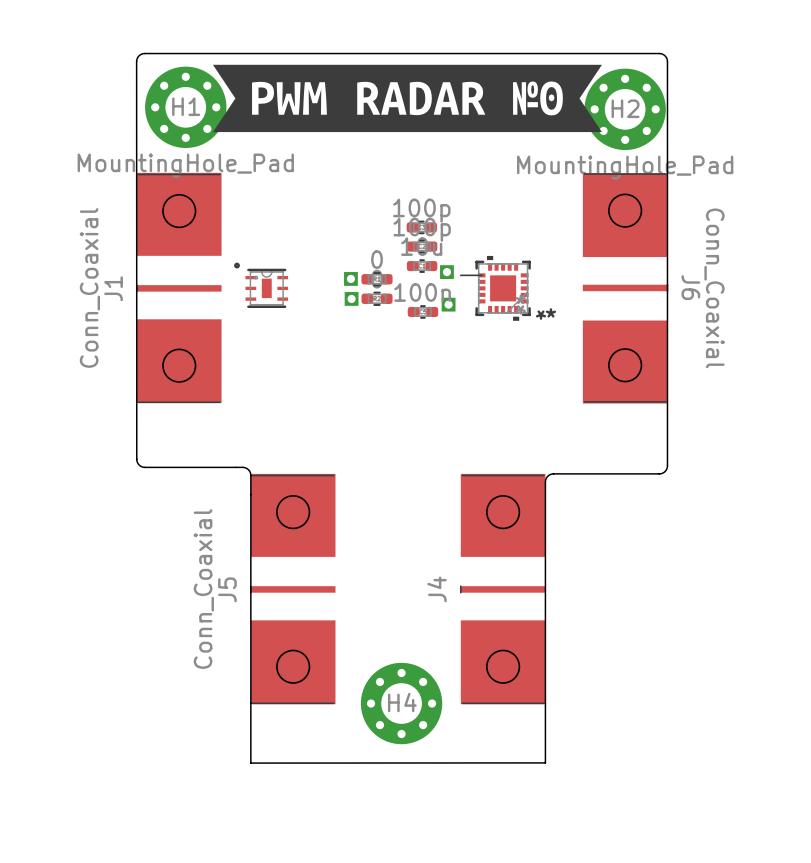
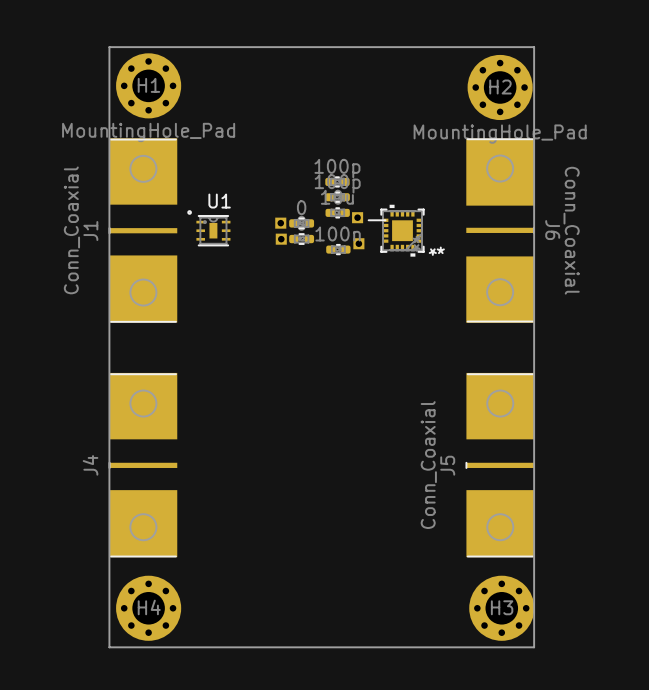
board edge: (144, 53) (659, 53) (666, 57) (667, 466) (665, 471) (660, 473) (553, 473) (546, 478) (545, 762) (250, 763) (250, 472) (242, 467) (143, 467) (139, 465) (136, 460) (136, 61) (139, 55) (144, 53) -> (109, 47) (109, 647) (534, 647) (534, 47) (109, 47)
drawing: [212, 64, 602, 133] -> none
U1 name: none -> U1 (219, 201)
J5 position: (292, 589) -> (499, 465)
J4 position: (502, 589) -> (143, 465)
H4 position: (401, 703) -> (148, 608)
H3: none -> (501, 608)

